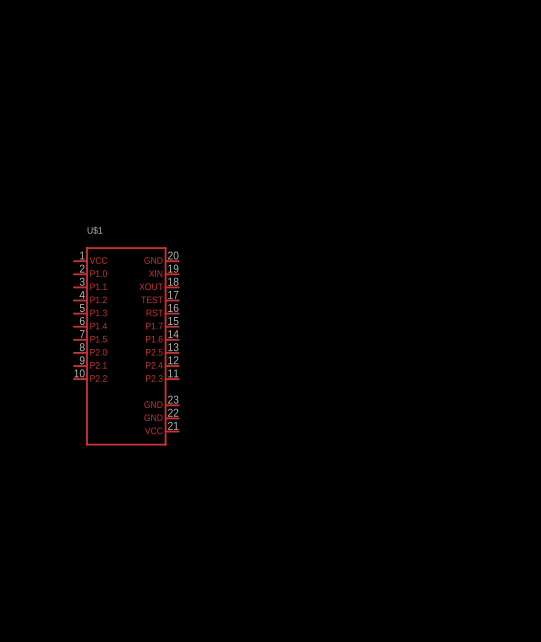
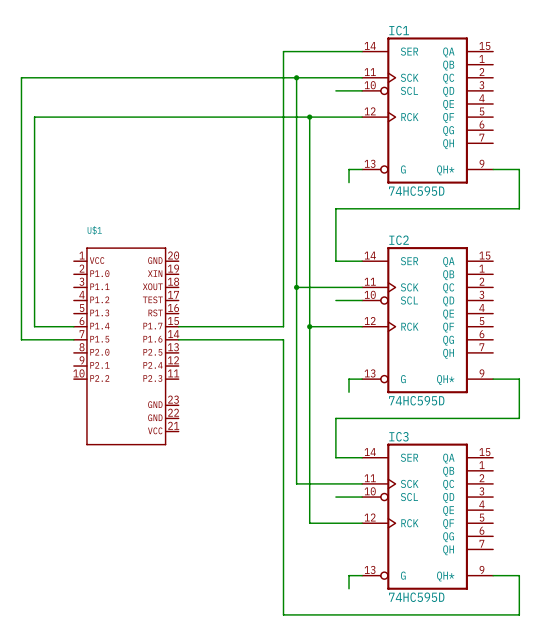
wire: none -> (362, 51) (283, 51) (283, 326) (178, 326)
wire: none -> (296, 77) (296, 483) (362, 483)
junction: none -> (296, 77)
wire: none -> (362, 77) (21, 77) (21, 339) (73, 339)
wire: none -> (335, 90) (362, 90)
IC1: none -> 74HC595D (427, 110)
wire: none -> (309, 117) (309, 523) (362, 523)
junction: none -> (309, 117)
wire: none -> (362, 117) (34, 117) (34, 326) (73, 326)
wire: none -> (362, 169) (349, 169) (349, 182)
wire: none -> (493, 169) (519, 169) (519, 208) (335, 208) (335, 261) (362, 261)
wire: none -> (296, 287) (362, 287)
junction: none -> (296, 287)
wire: none -> (335, 300) (362, 300)
IC2: none -> 74HC595D (427, 320)
wire: none -> (309, 326) (362, 326)
junction: none -> (309, 326)
wire: none -> (178, 339) (283, 339) (283, 614) (519, 614) (519, 575) (493, 575)
wire: none -> (362, 379) (349, 379) (349, 392)
wire: none -> (493, 379) (519, 379) (519, 418) (335, 418) (335, 457) (362, 457)
wire: none -> (335, 497) (362, 497)
IC3: none -> 74HC595D (427, 516)
wire: none -> (362, 575) (349, 575) (349, 588)

